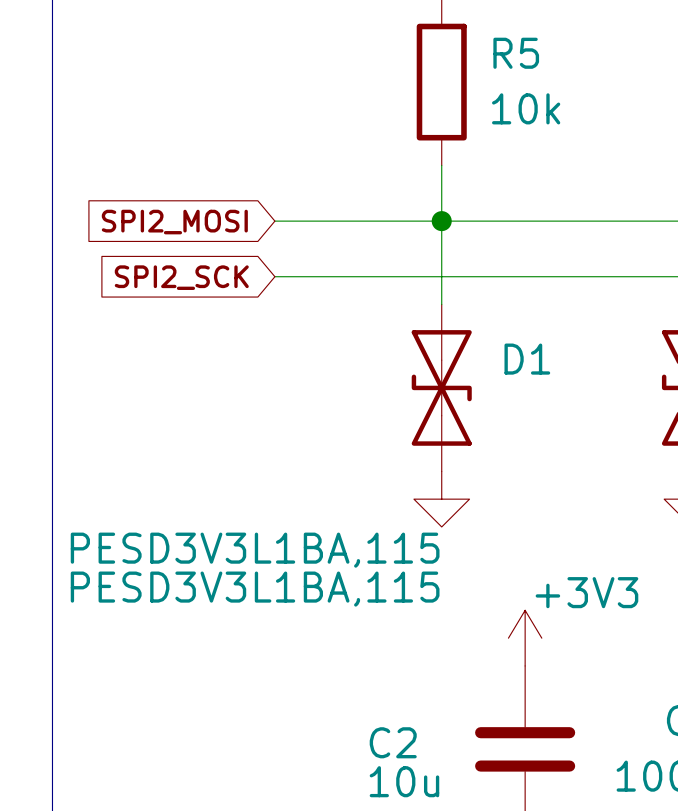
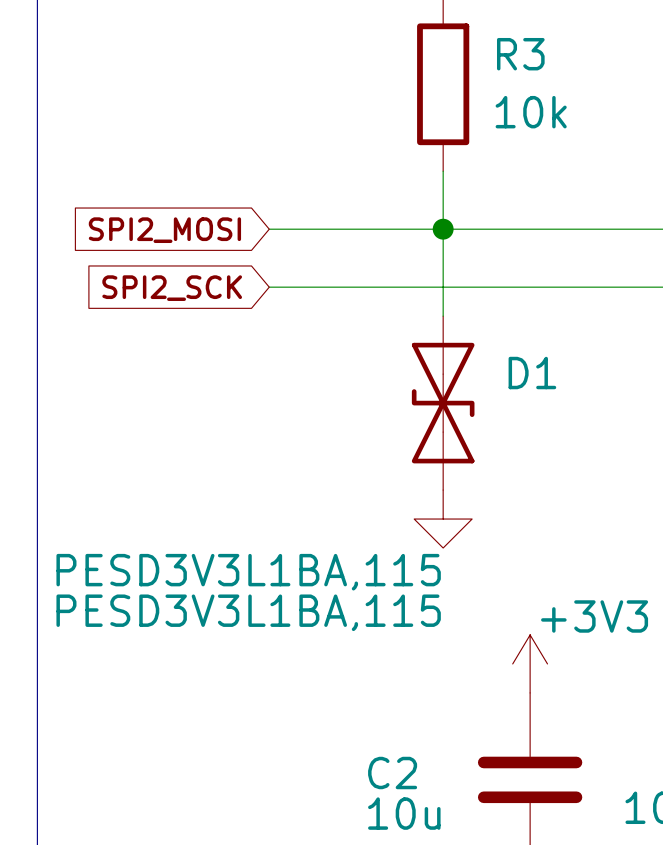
R5 name: R5 (516, 53) -> R3 (520, 54)

